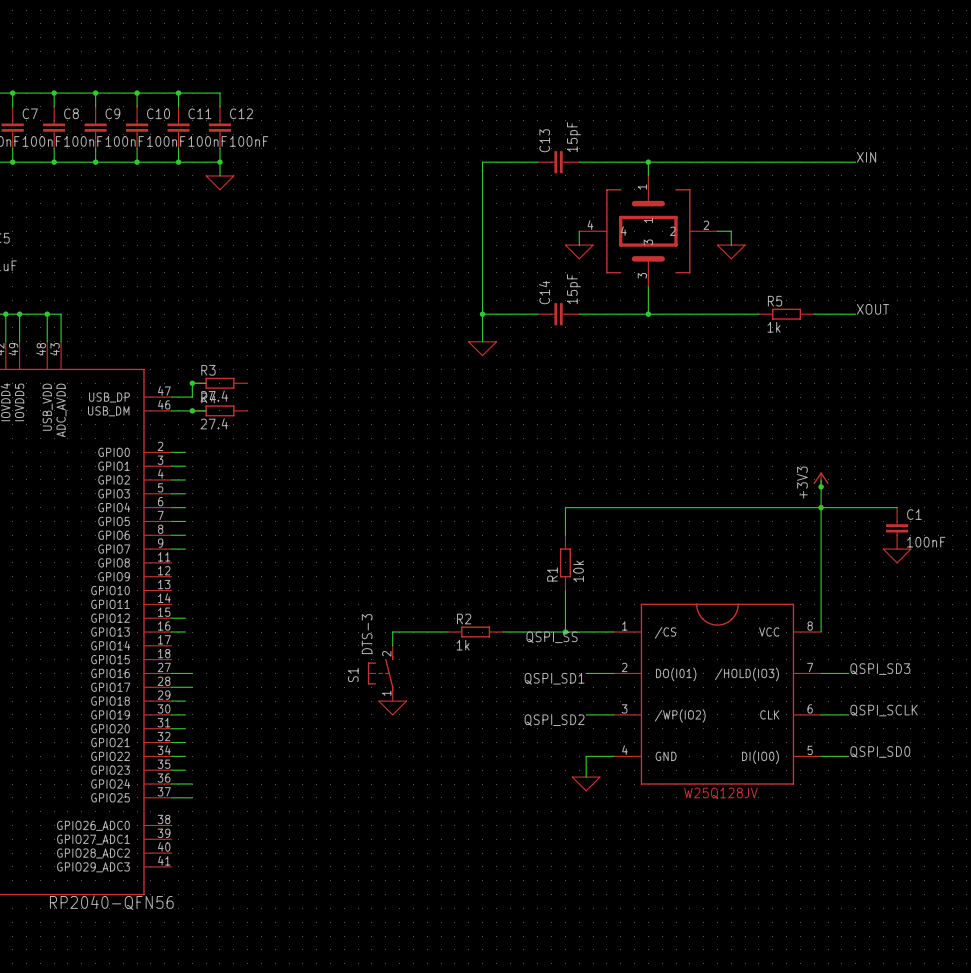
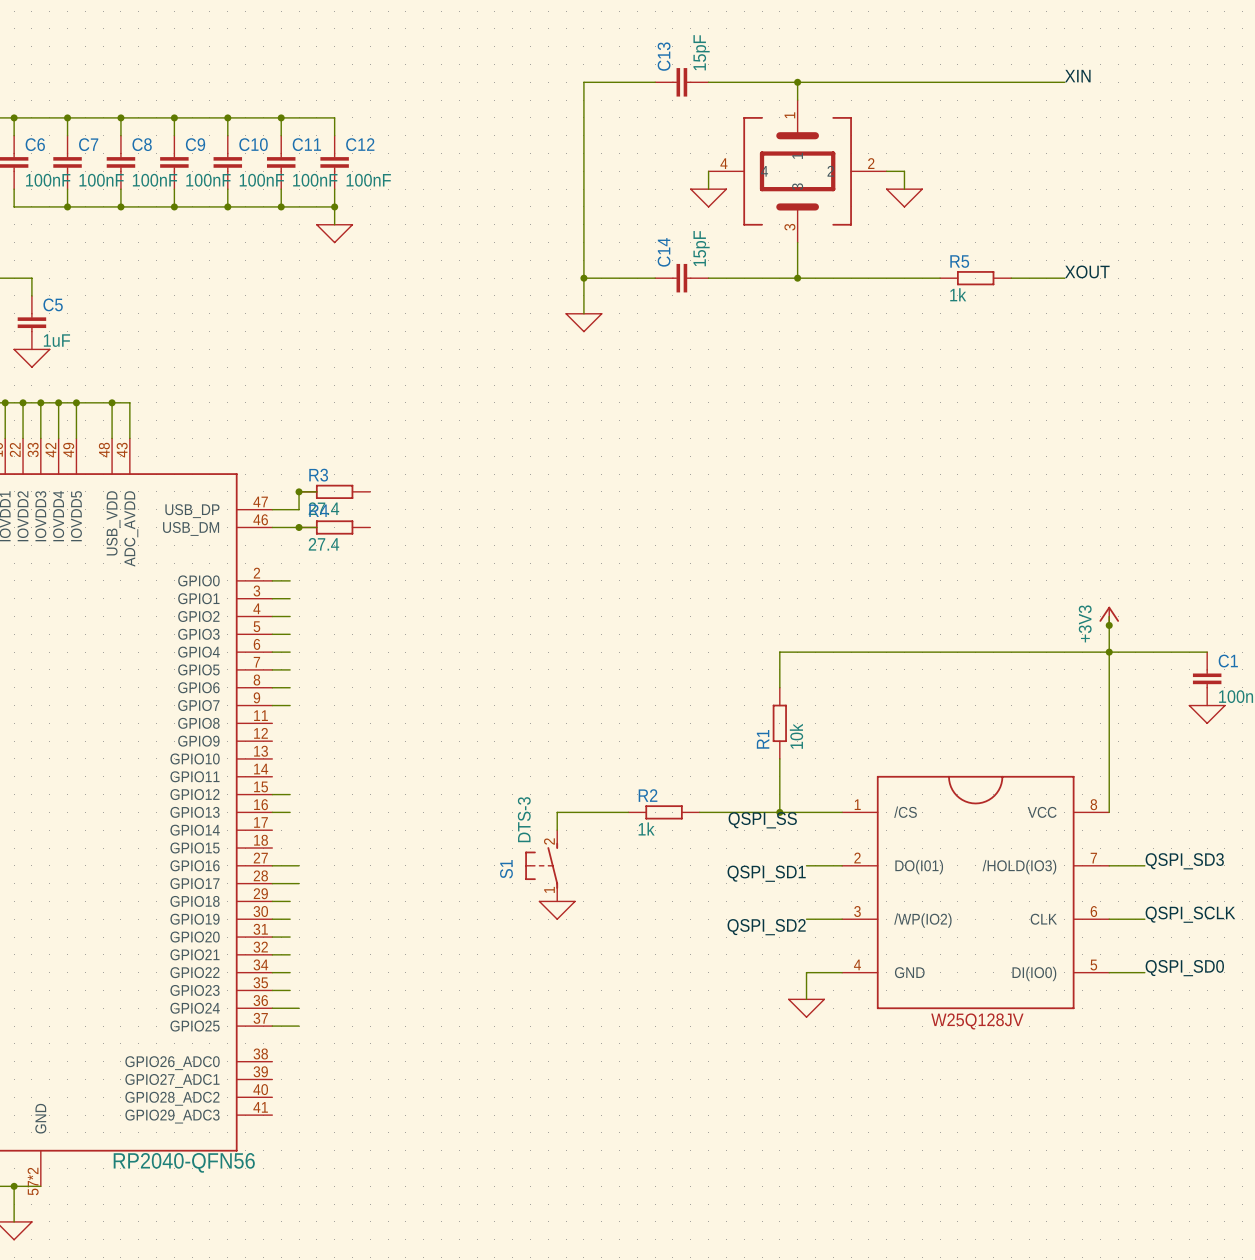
junction: none -> (797, 82)
power symbol: none -> (708, 198)
power symbol: none -> (904, 198)
label position: XIN (866, 157) -> XIN (1077, 76)
wire: (537, 162) (482, 162) (482, 341) -> (655, 82) (583, 82) (583, 313)
C13 position: (558, 162) -> (681, 82)
wire: (579, 162) (855, 162) -> (708, 82) (1064, 82)
wire: (648, 162) (648, 175) -> (797, 82) (797, 100)
junction: (648, 162) -> none
junction: none -> (583, 278)
junction: none -> (797, 278)
wire: (579, 231) (579, 245) -> (708, 171) (708, 189)
part position: (648, 231) -> (797, 171)
wire: (717, 231) (731, 231) (731, 245) -> (886, 171) (904, 171) (904, 189)
power symbol: none -> (583, 322)
power symbol: (579, 251) -> none
power symbol: (731, 251) -> none
wire: (648, 286) (648, 314) -> (797, 242) (797, 278)
label position: XOUT (872, 309) -> XOUT (1087, 271)
wire: (482, 314) (537, 314) -> (583, 278) (655, 278)
junction: (482, 314) -> none
C14 position: (558, 314) -> (681, 278)
wire: (579, 314) (758, 314) -> (708, 278) (940, 278)
junction: (648, 314) -> none
R5 position: (786, 314) -> (975, 278)
wire: (814, 314) (855, 314) -> (1011, 278) (1064, 278)
power symbol: (482, 348) -> none

